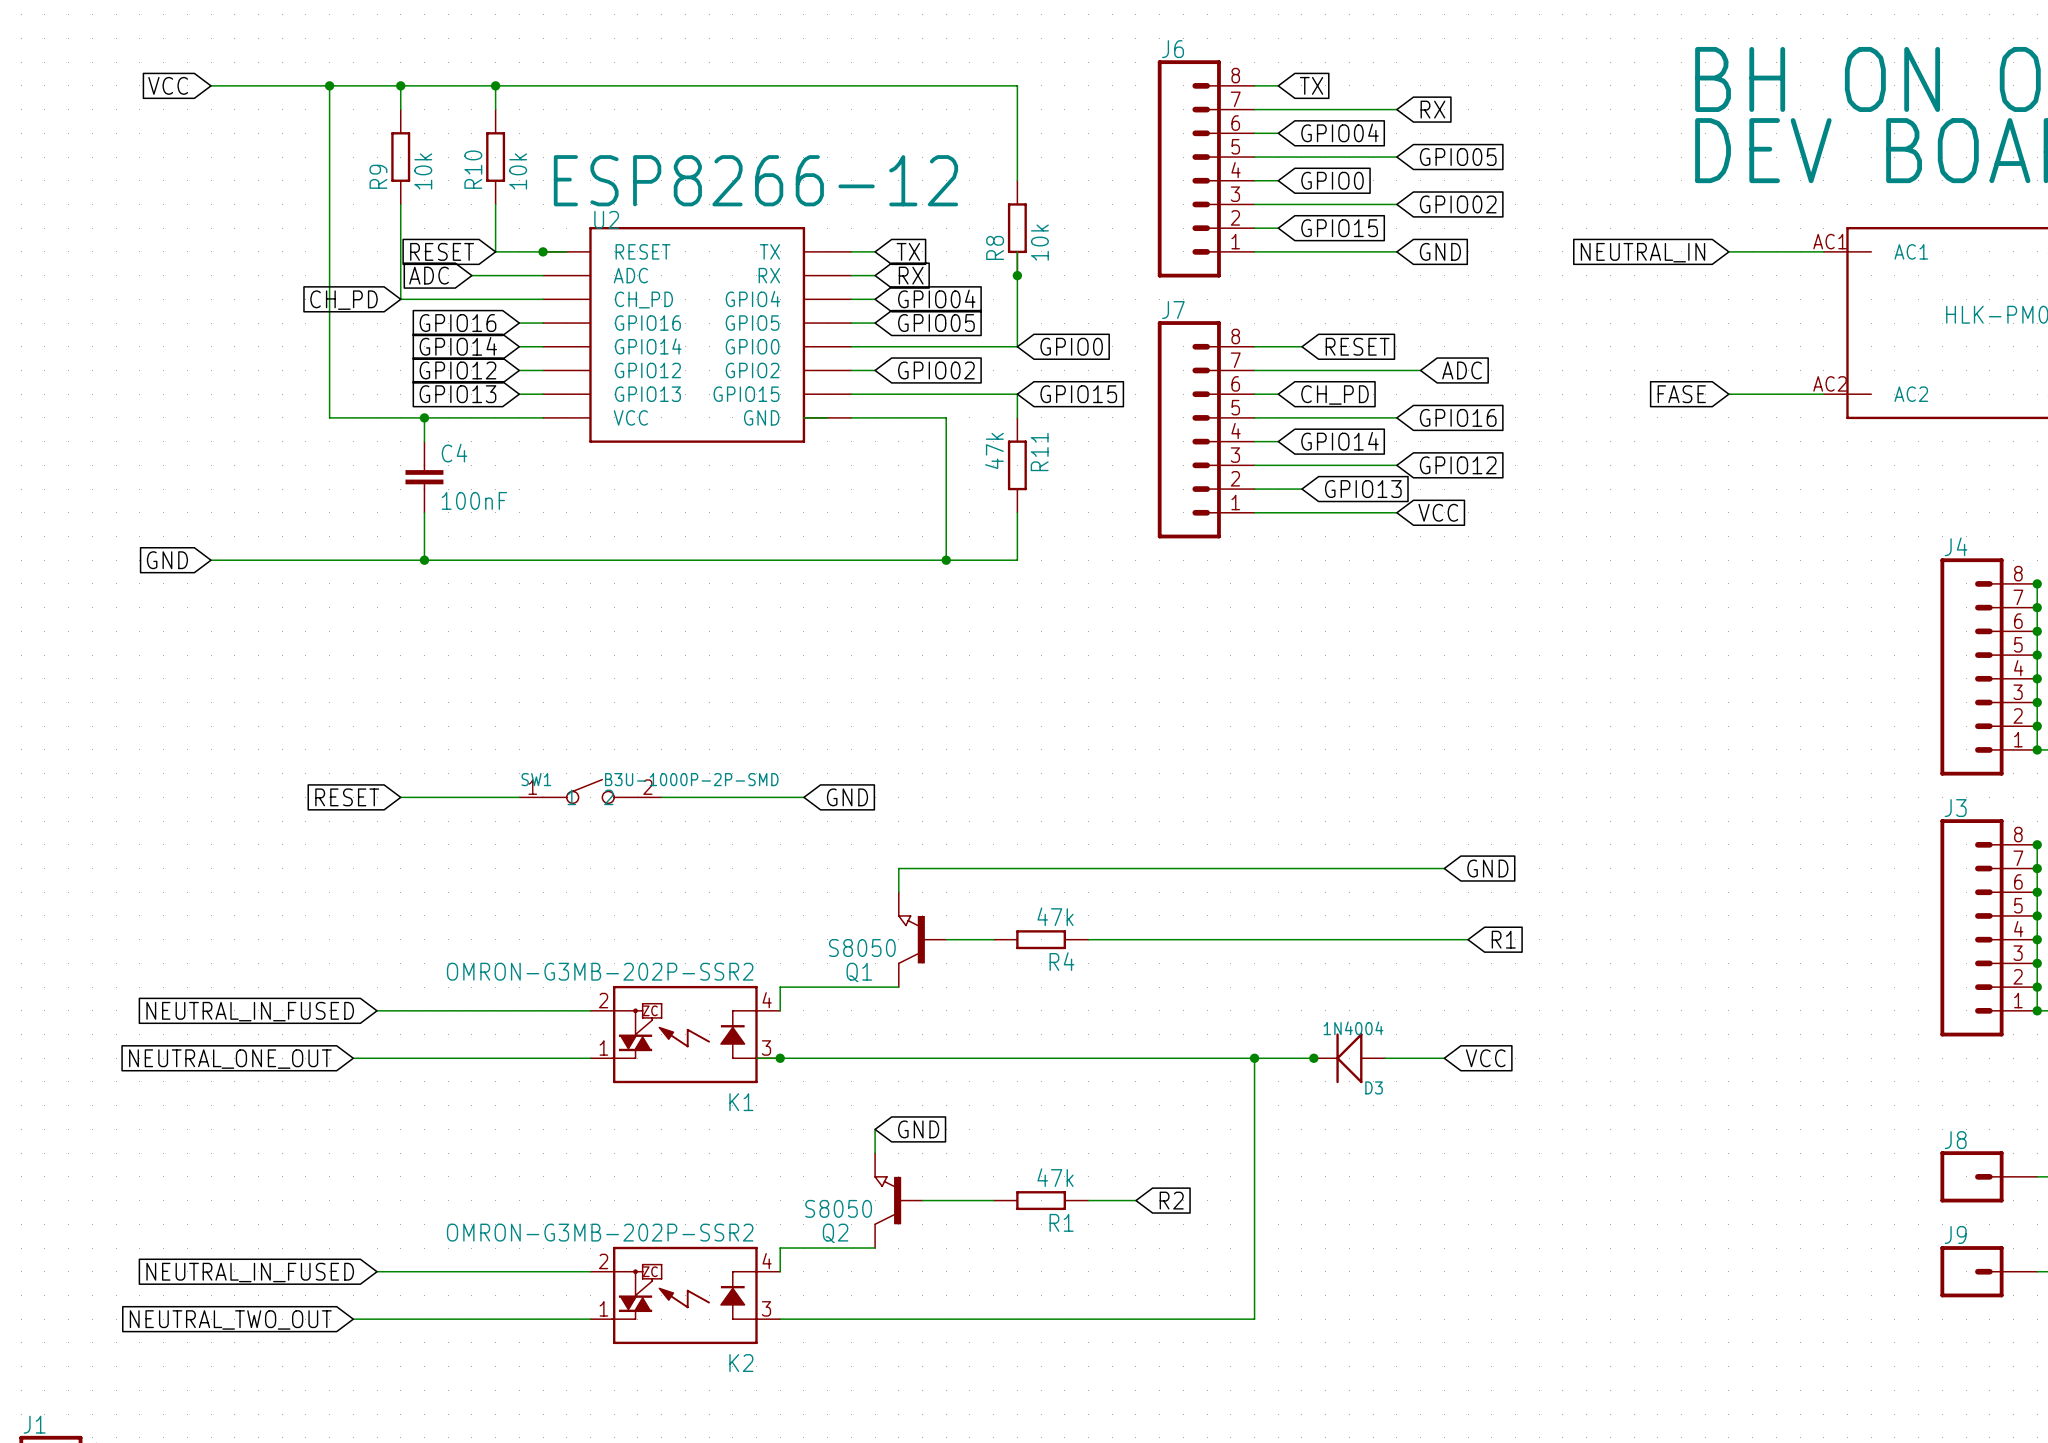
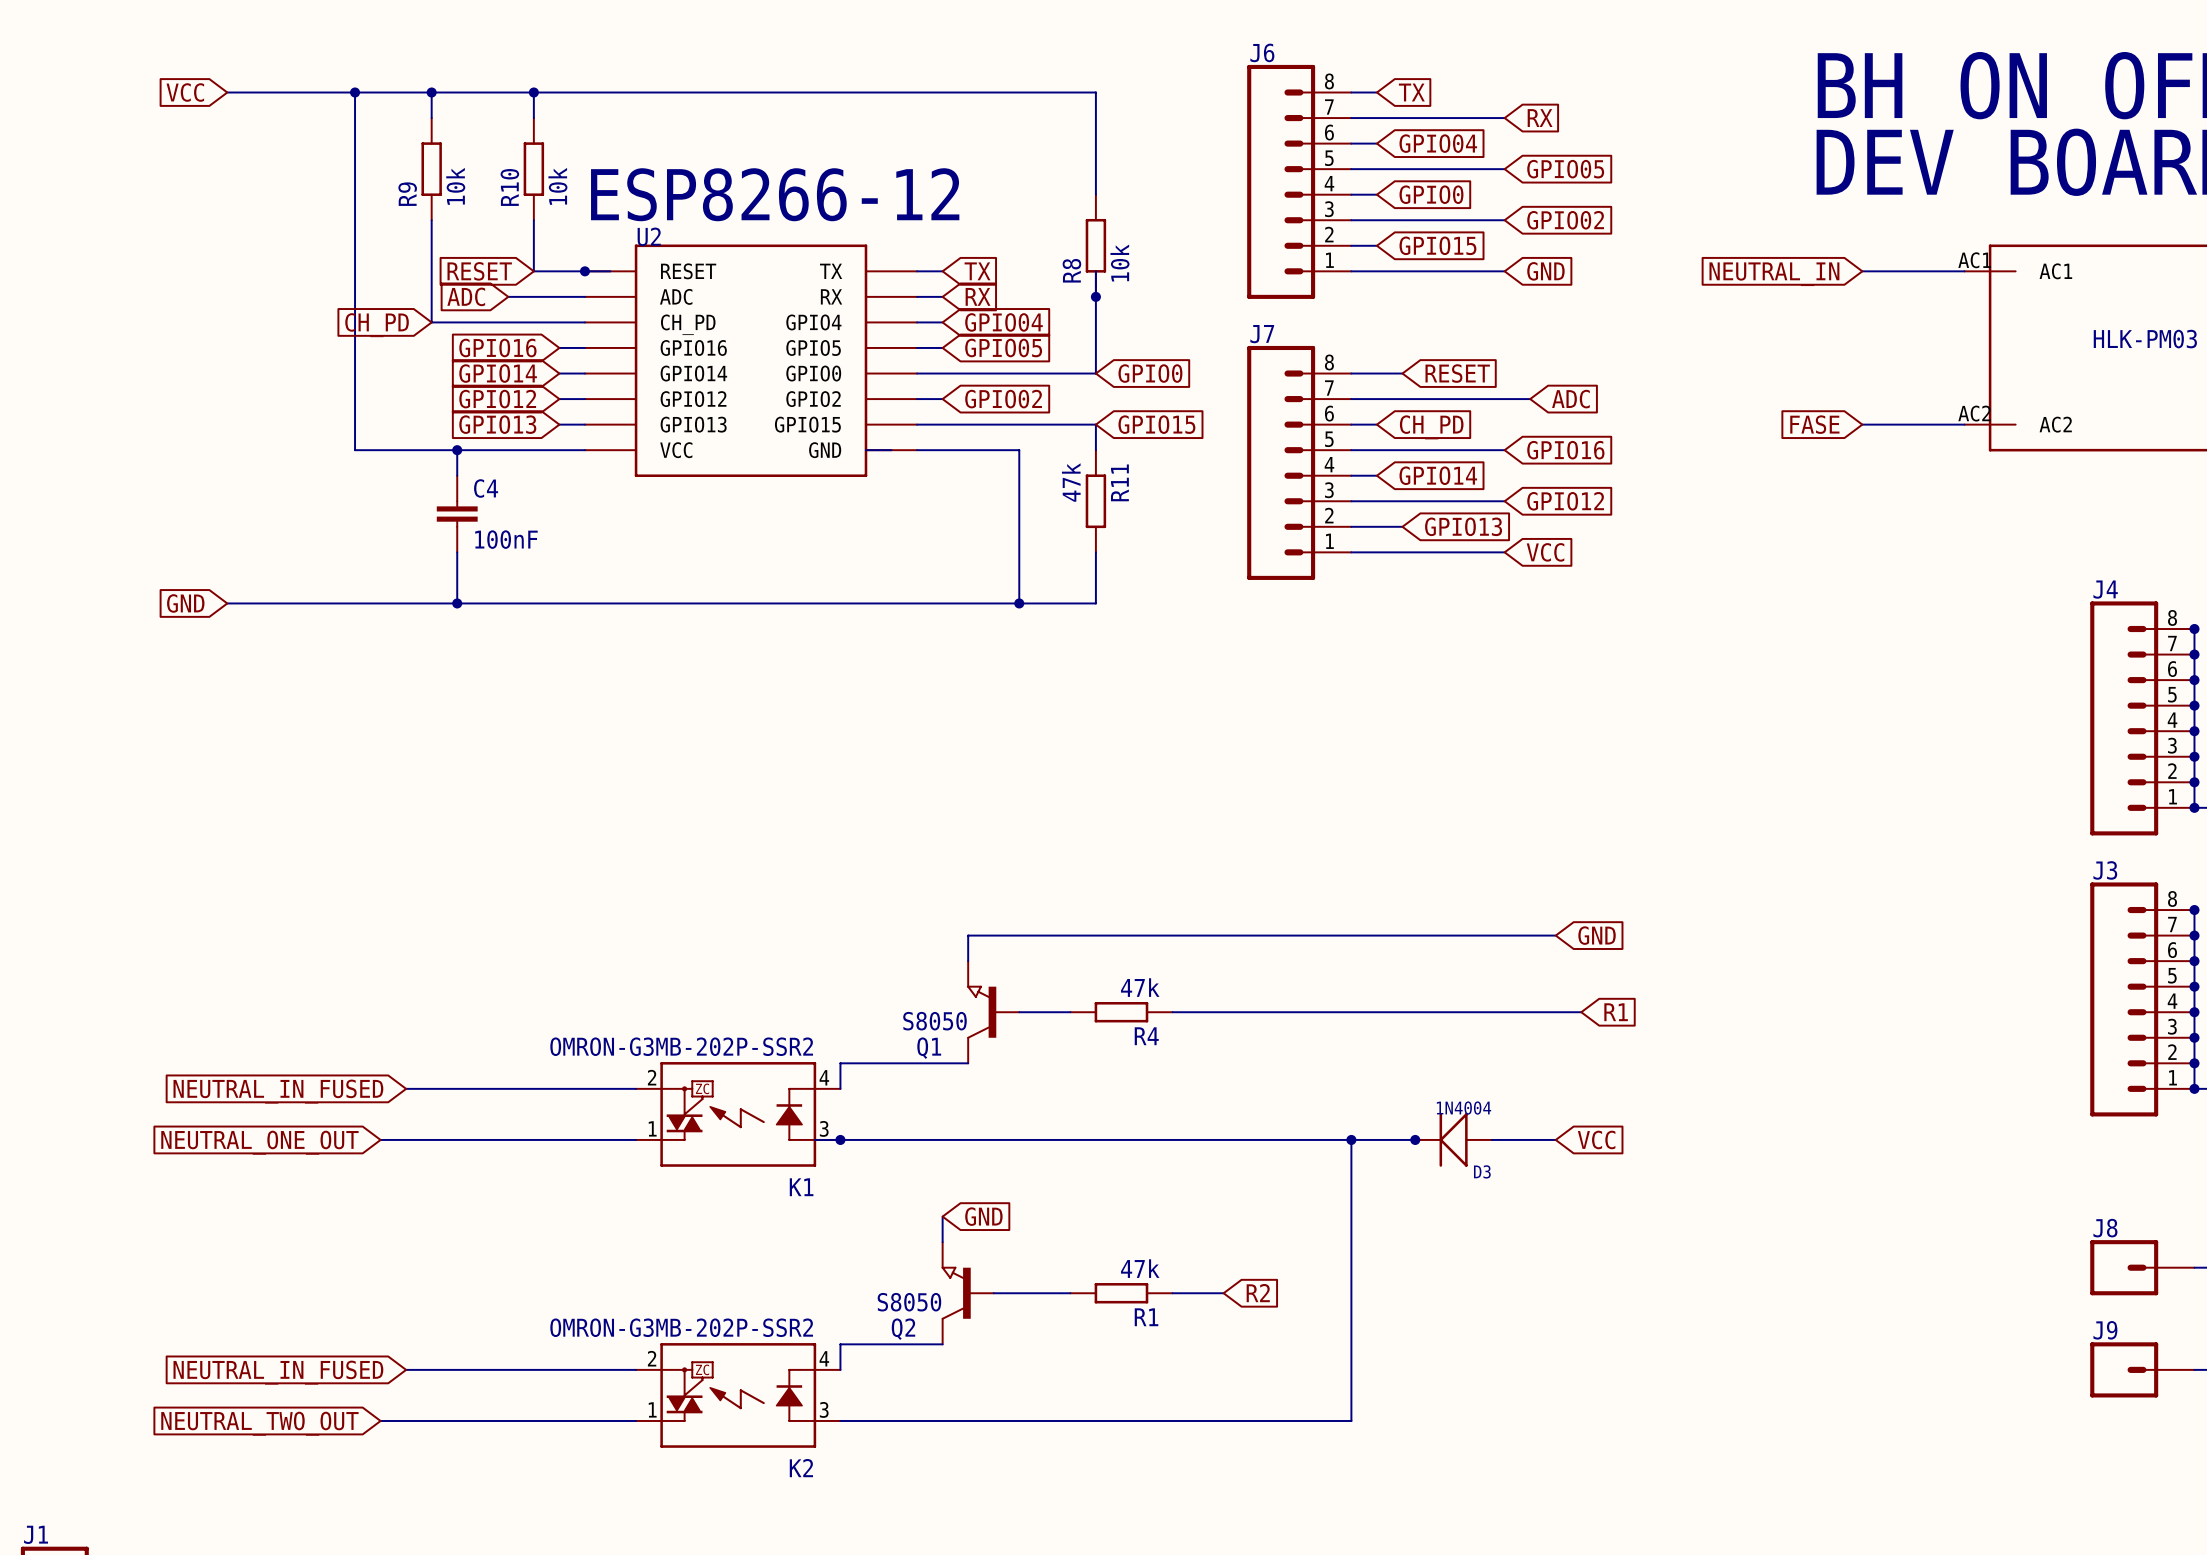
SW1: B3U-1000P-2P-SMD (590, 791) -> none
global label: RESET (347, 797) -> none
wire: (400, 797) (519, 797) -> none
wire: (661, 797) (803, 797) -> none
global label: GND (847, 797) -> none

